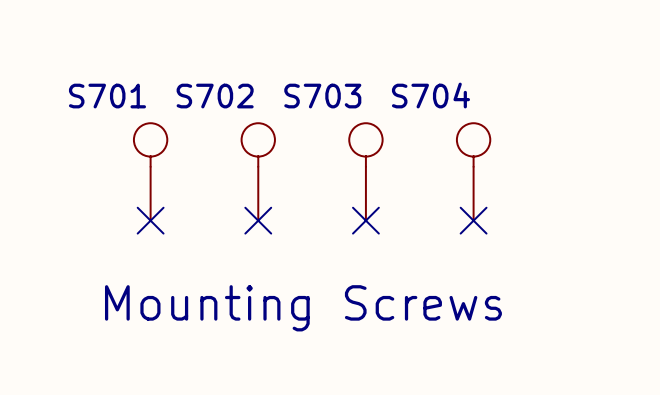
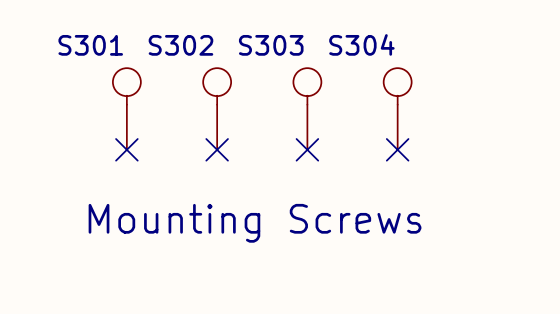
S704 name: S704 (430, 95) -> S304 (361, 44)
S701 name: S701 (107, 96) -> S301 (90, 45)
S702 name: S702 (215, 96) -> S302 (180, 45)
S703 name: S703 (322, 96) -> S303 (271, 45)

